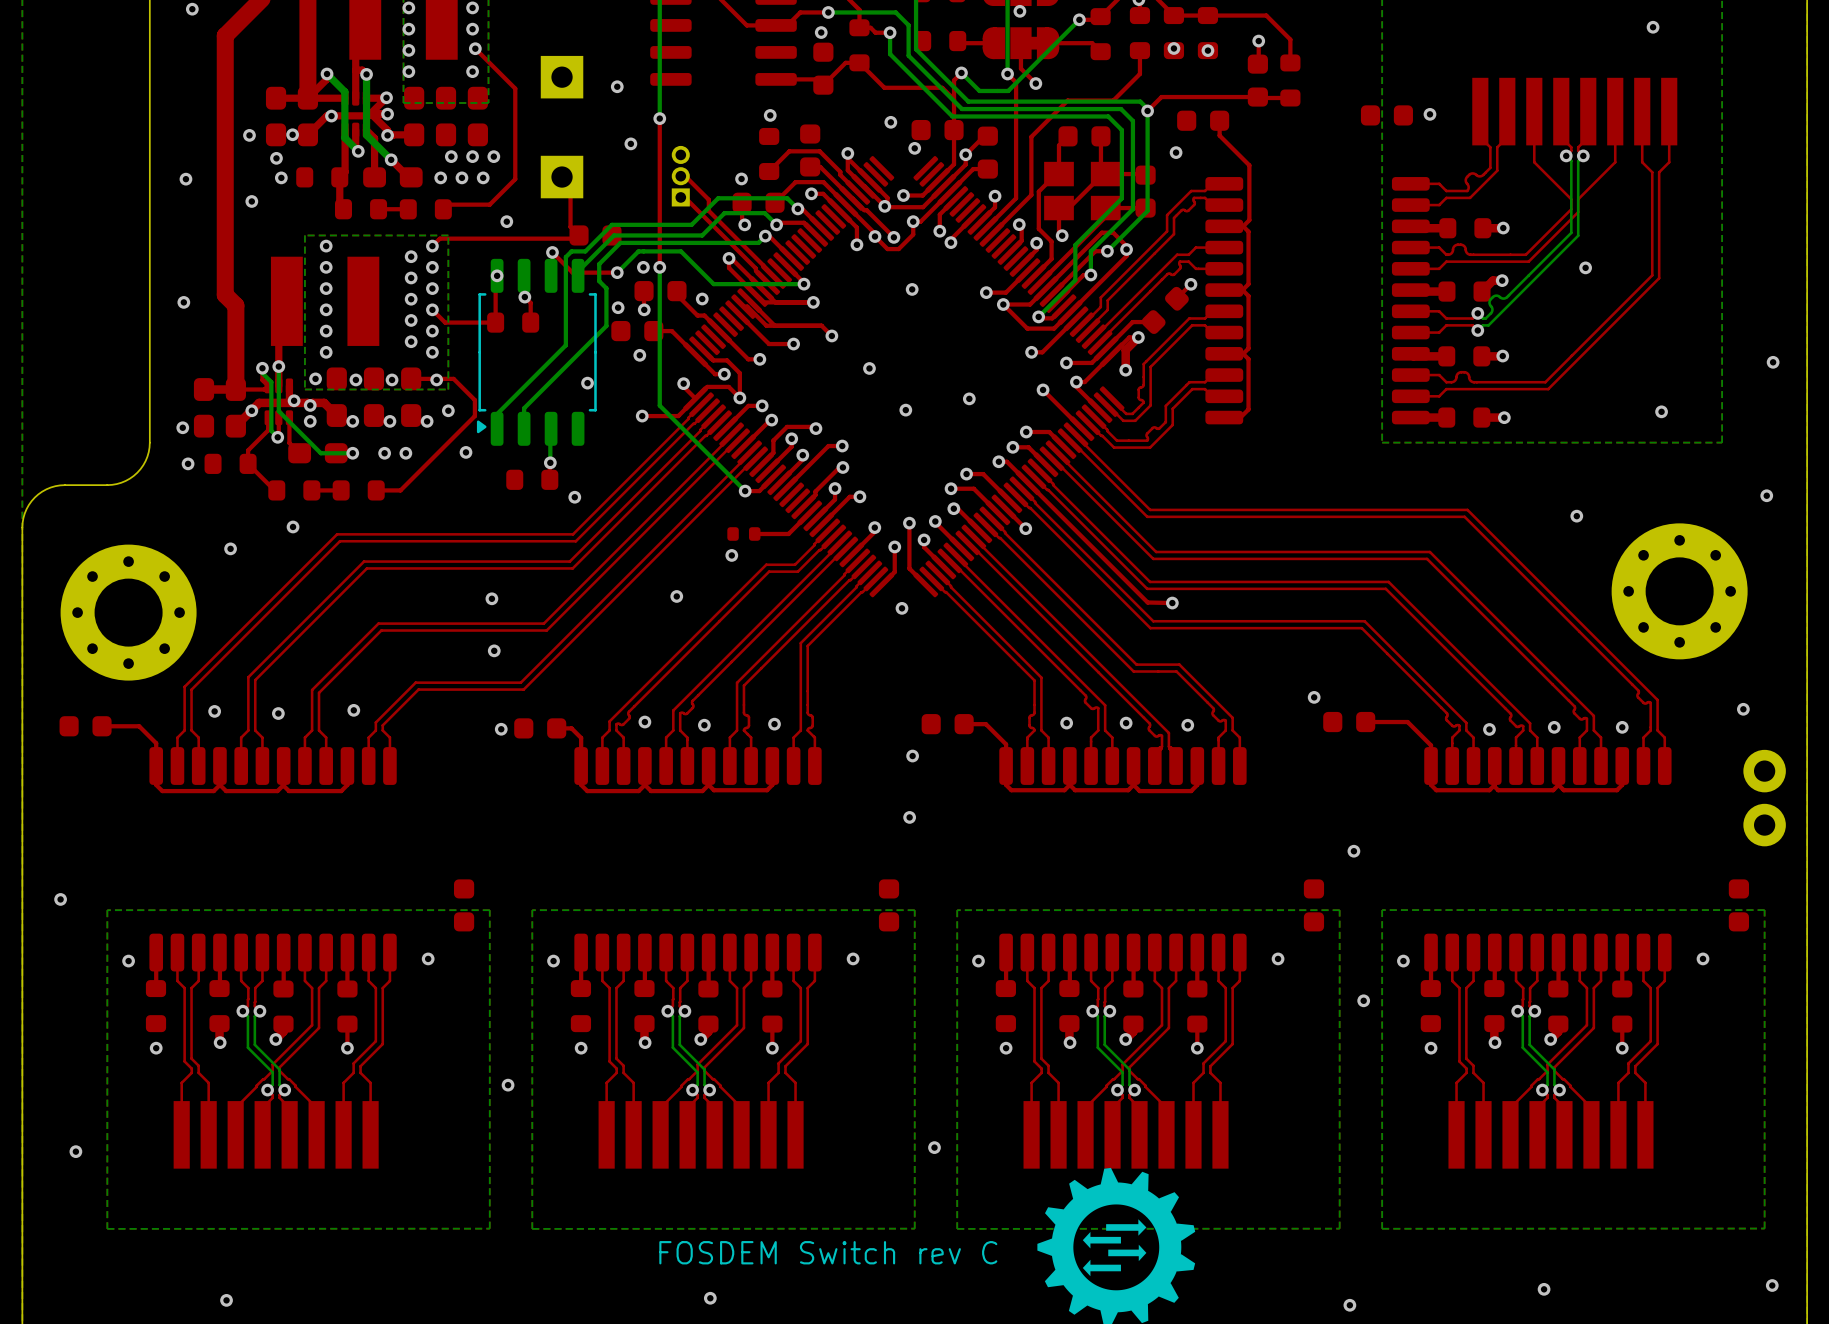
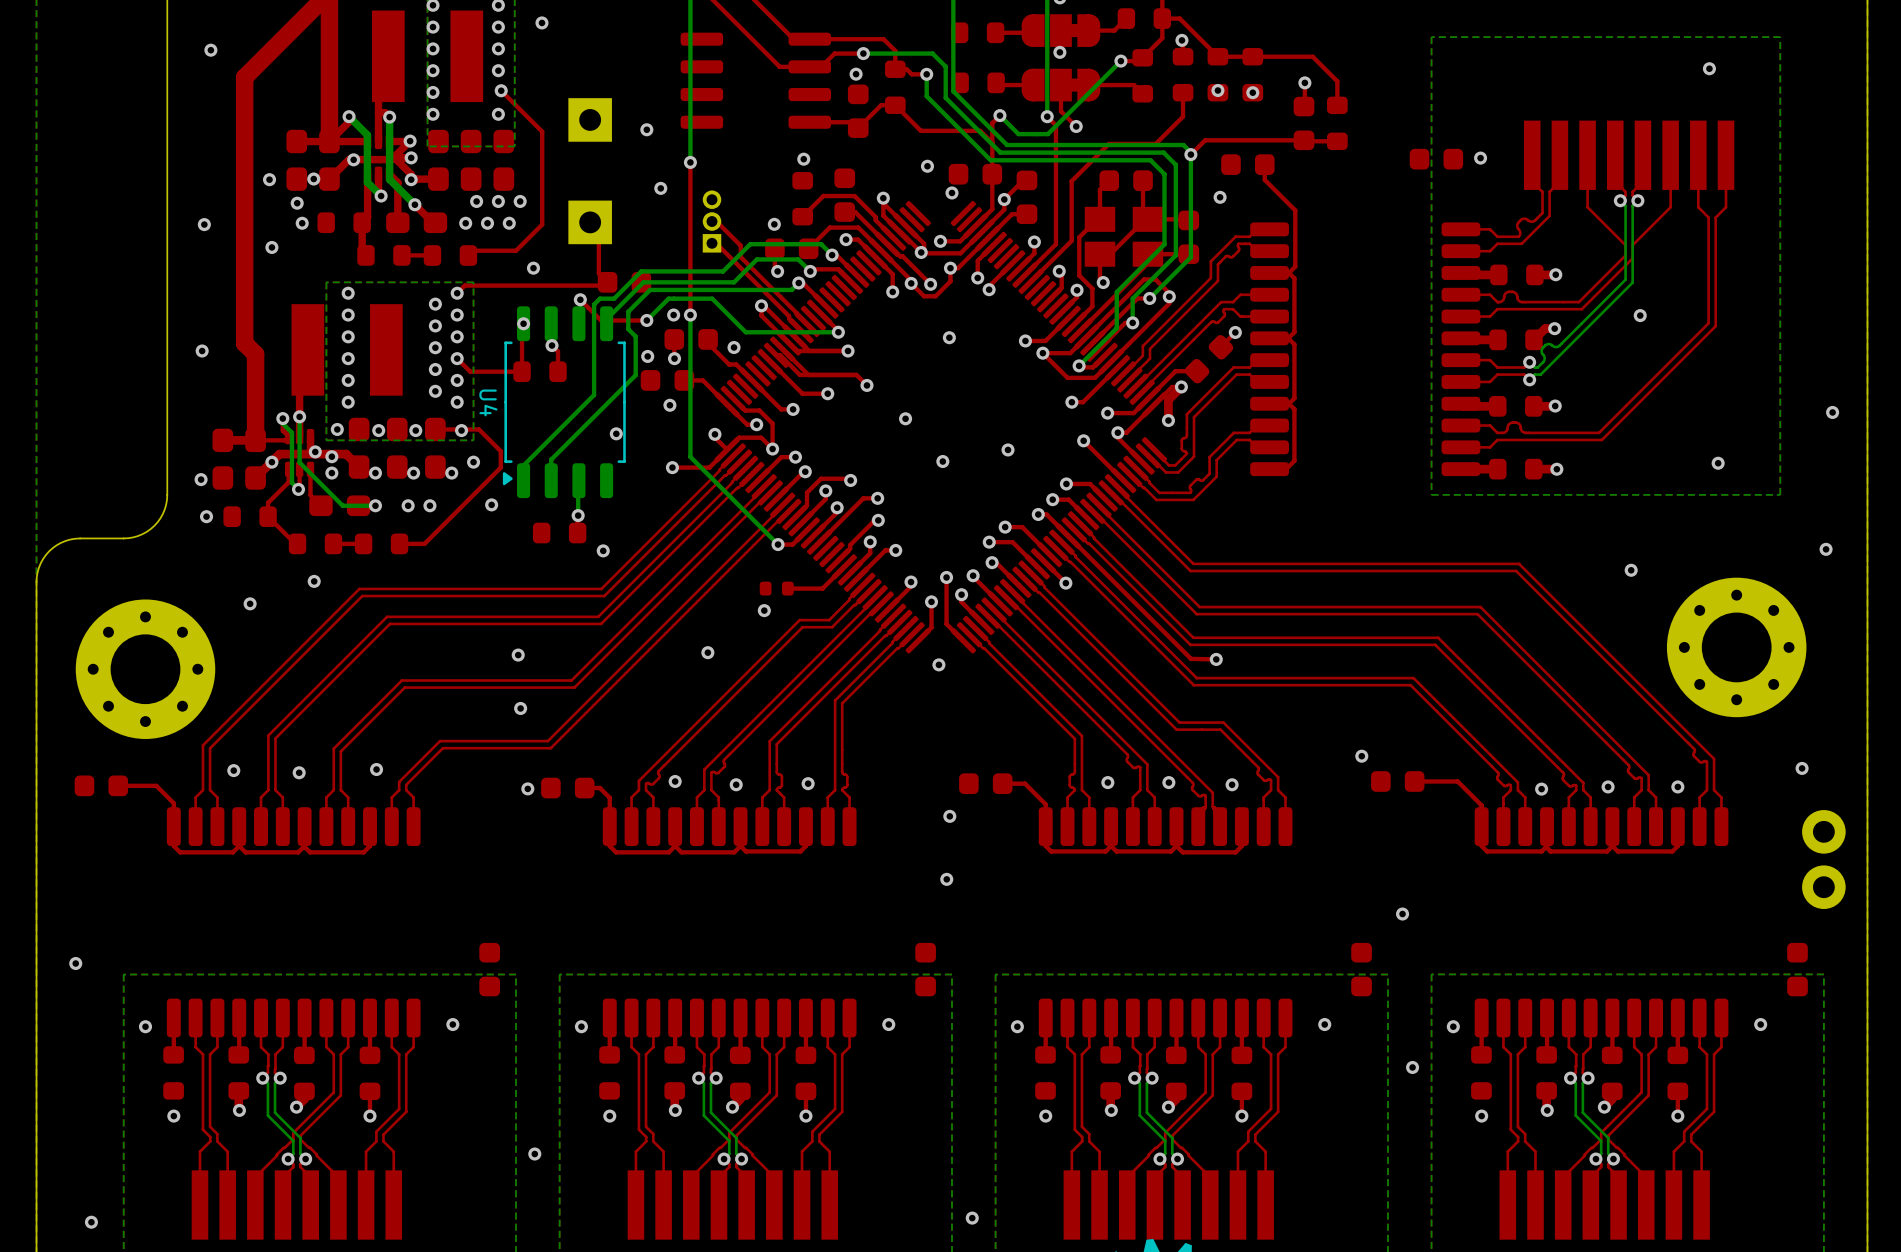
U4 name: none -> U4 (488, 402)

